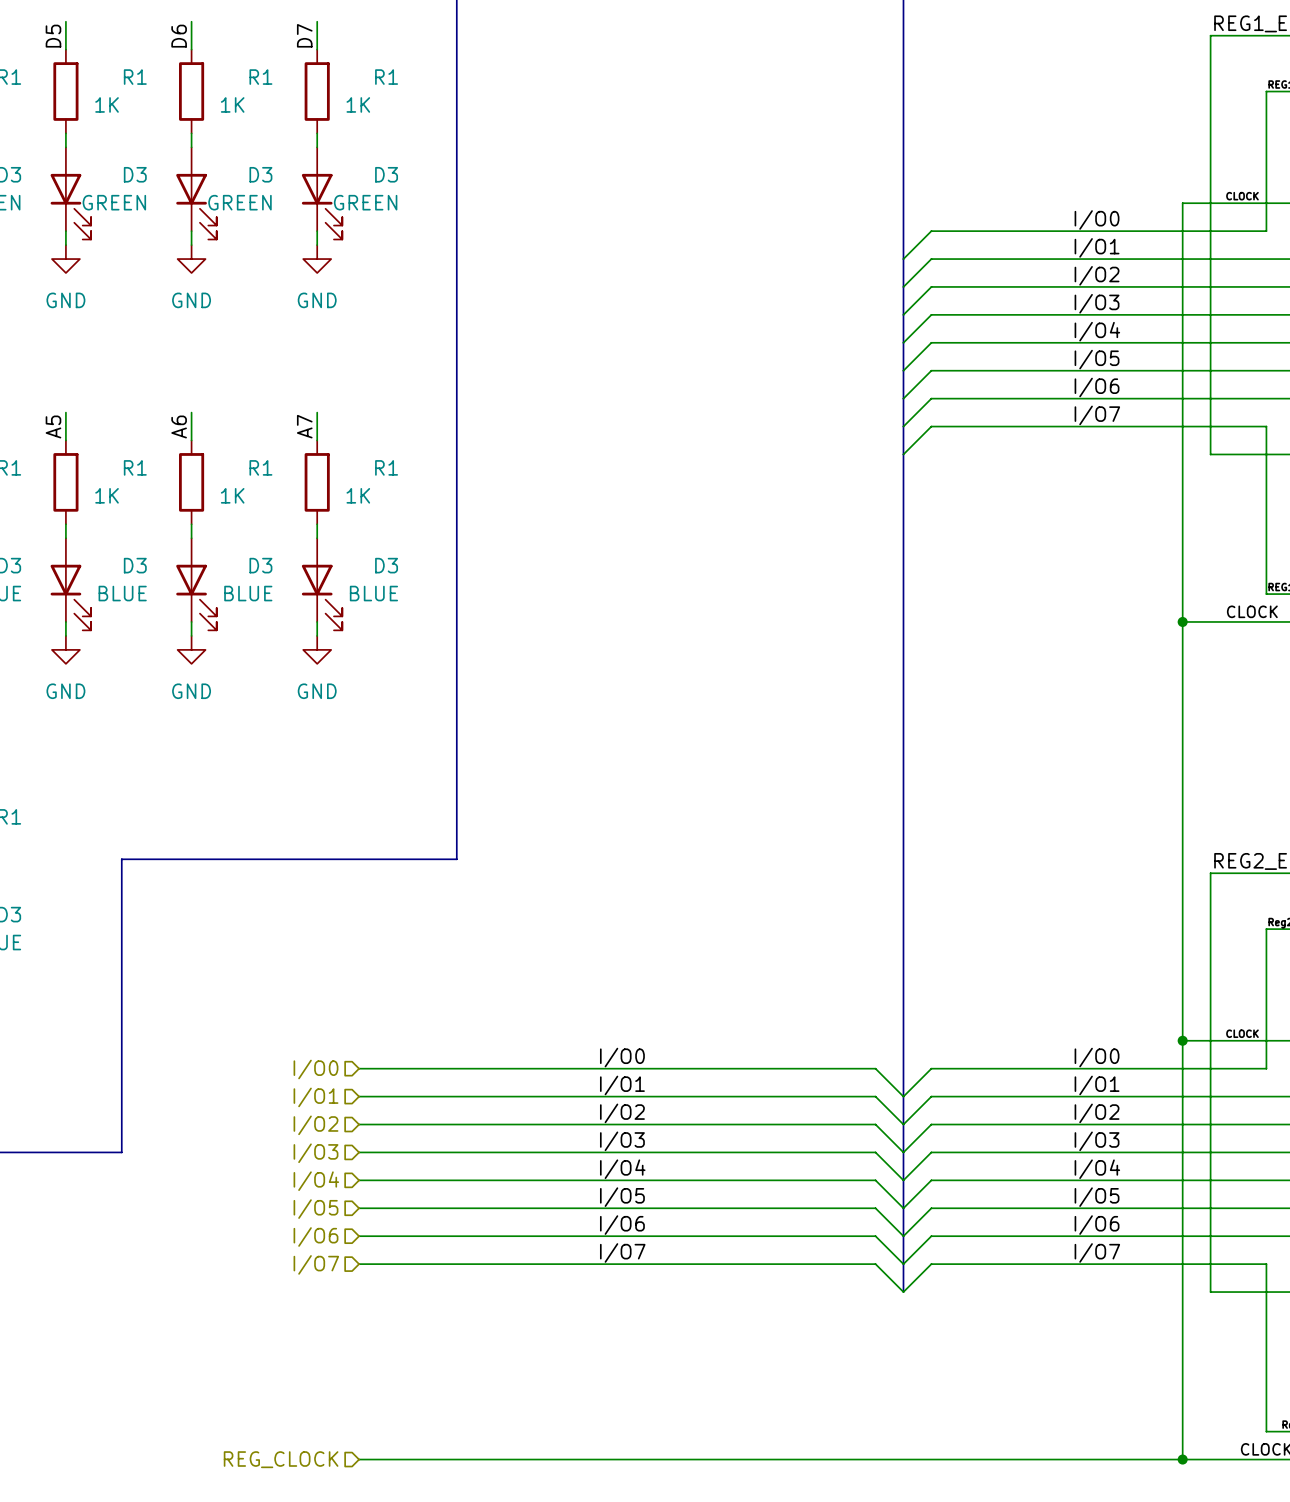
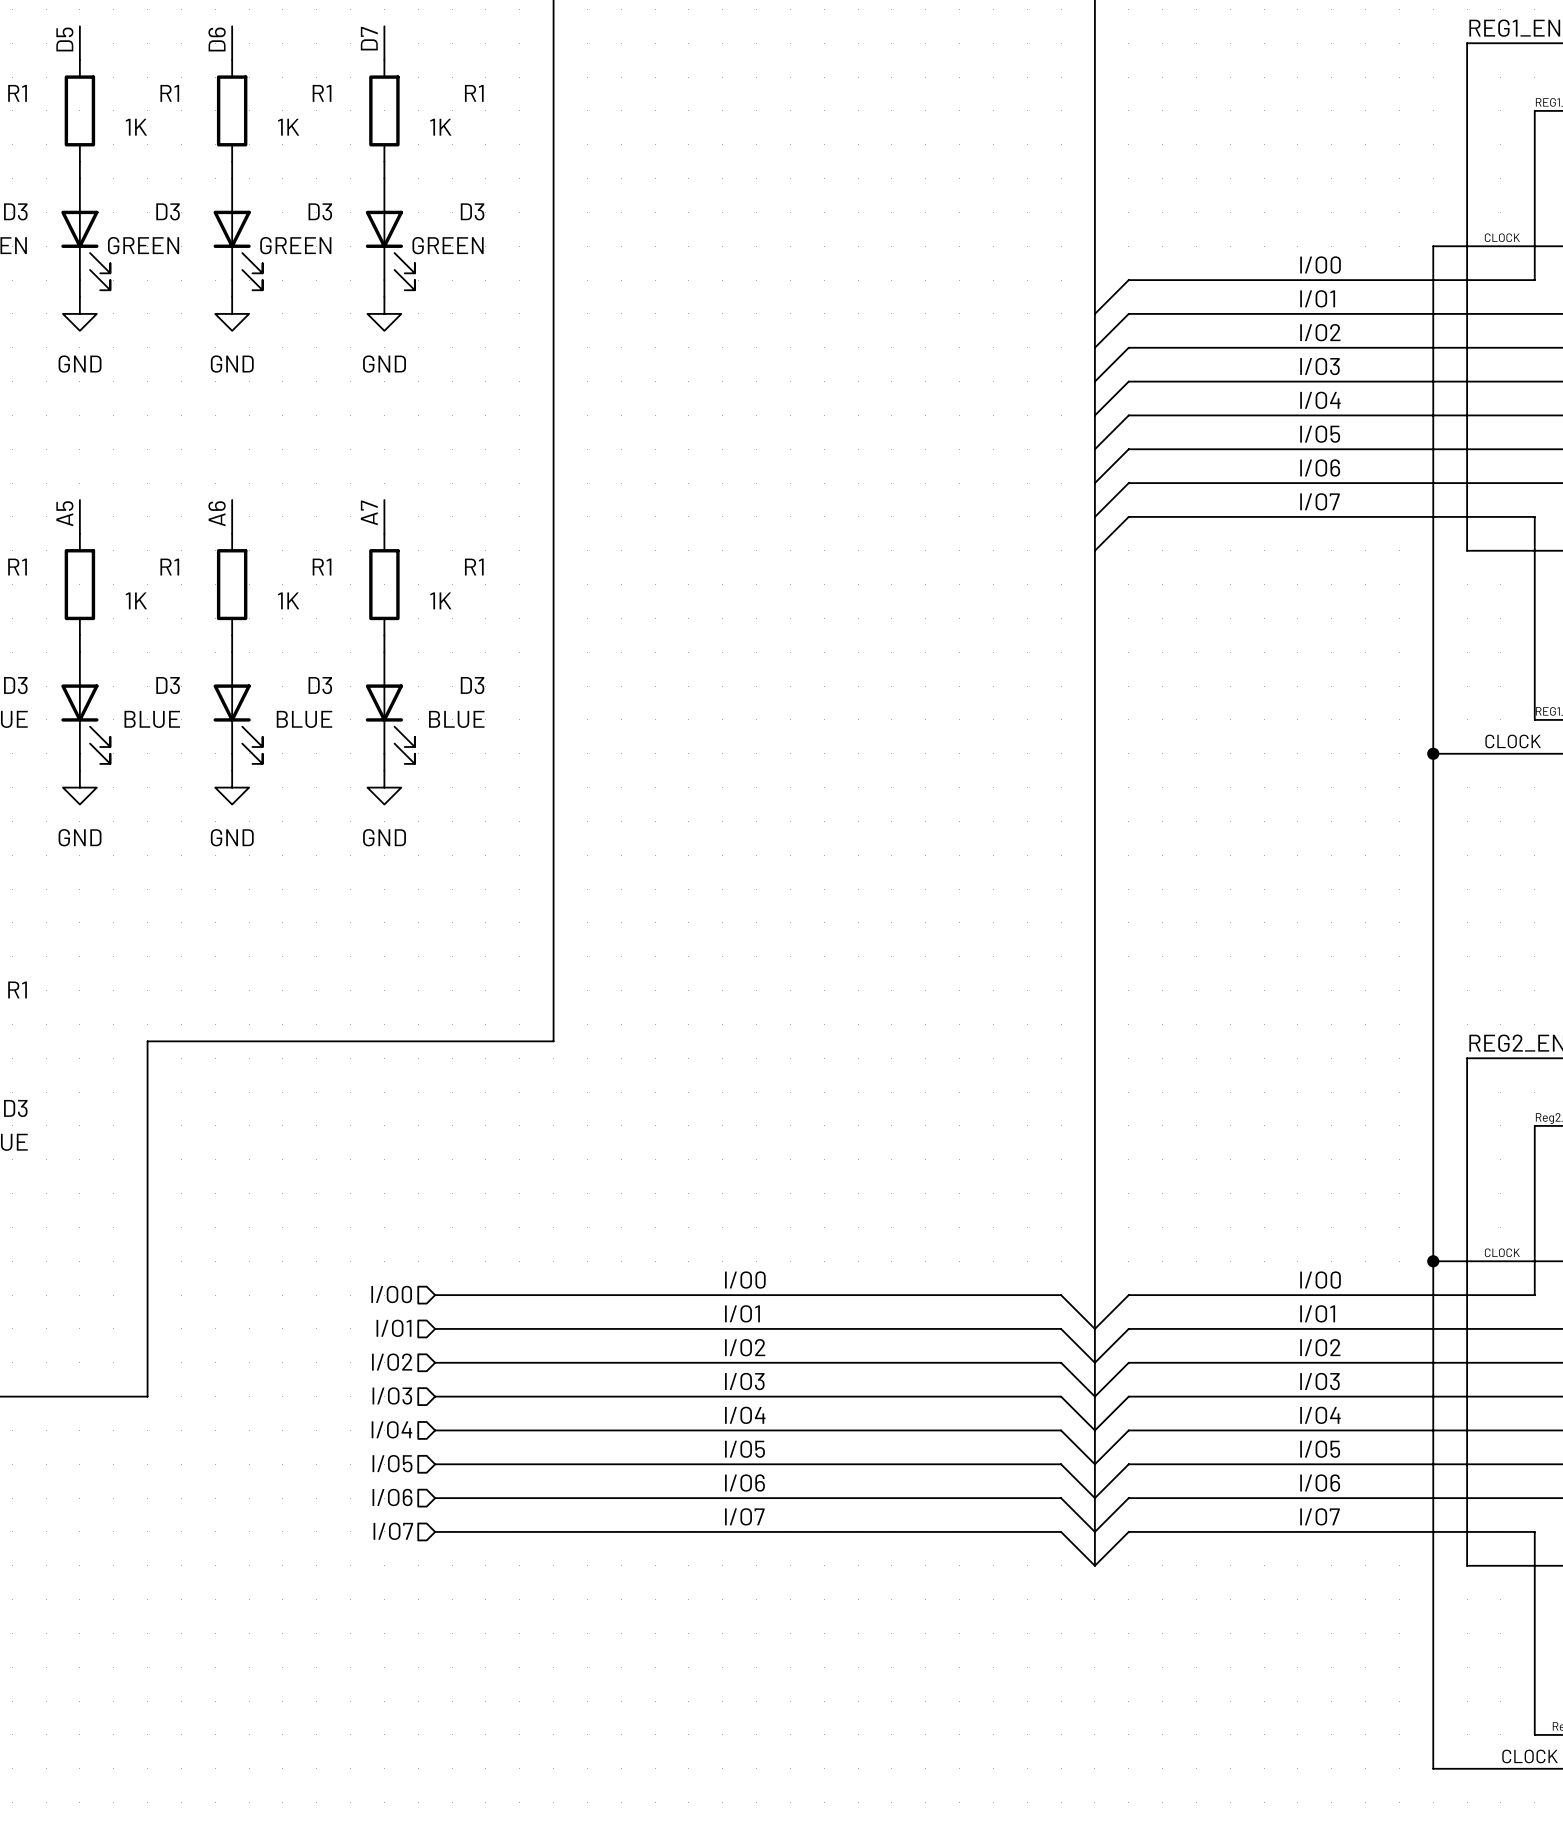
hierarchical label: REG_CLOCK (281, 1459) -> none
wire: (359, 1459) (1182, 1459) -> none
junction: (1182, 1459) -> none

